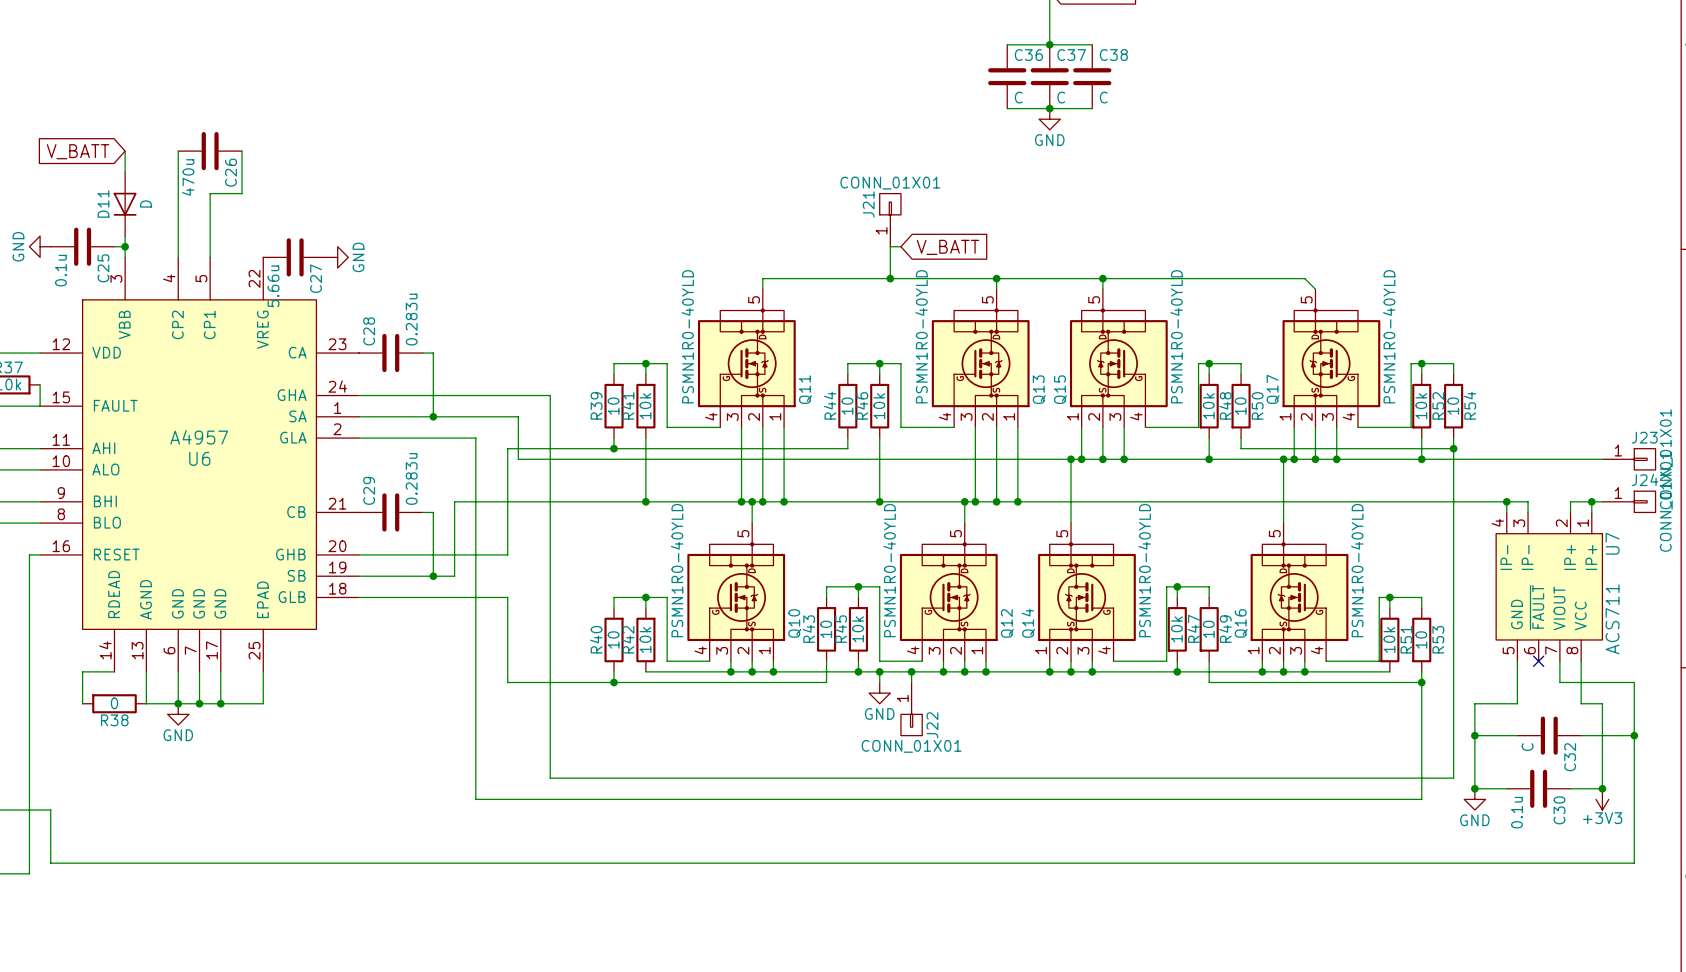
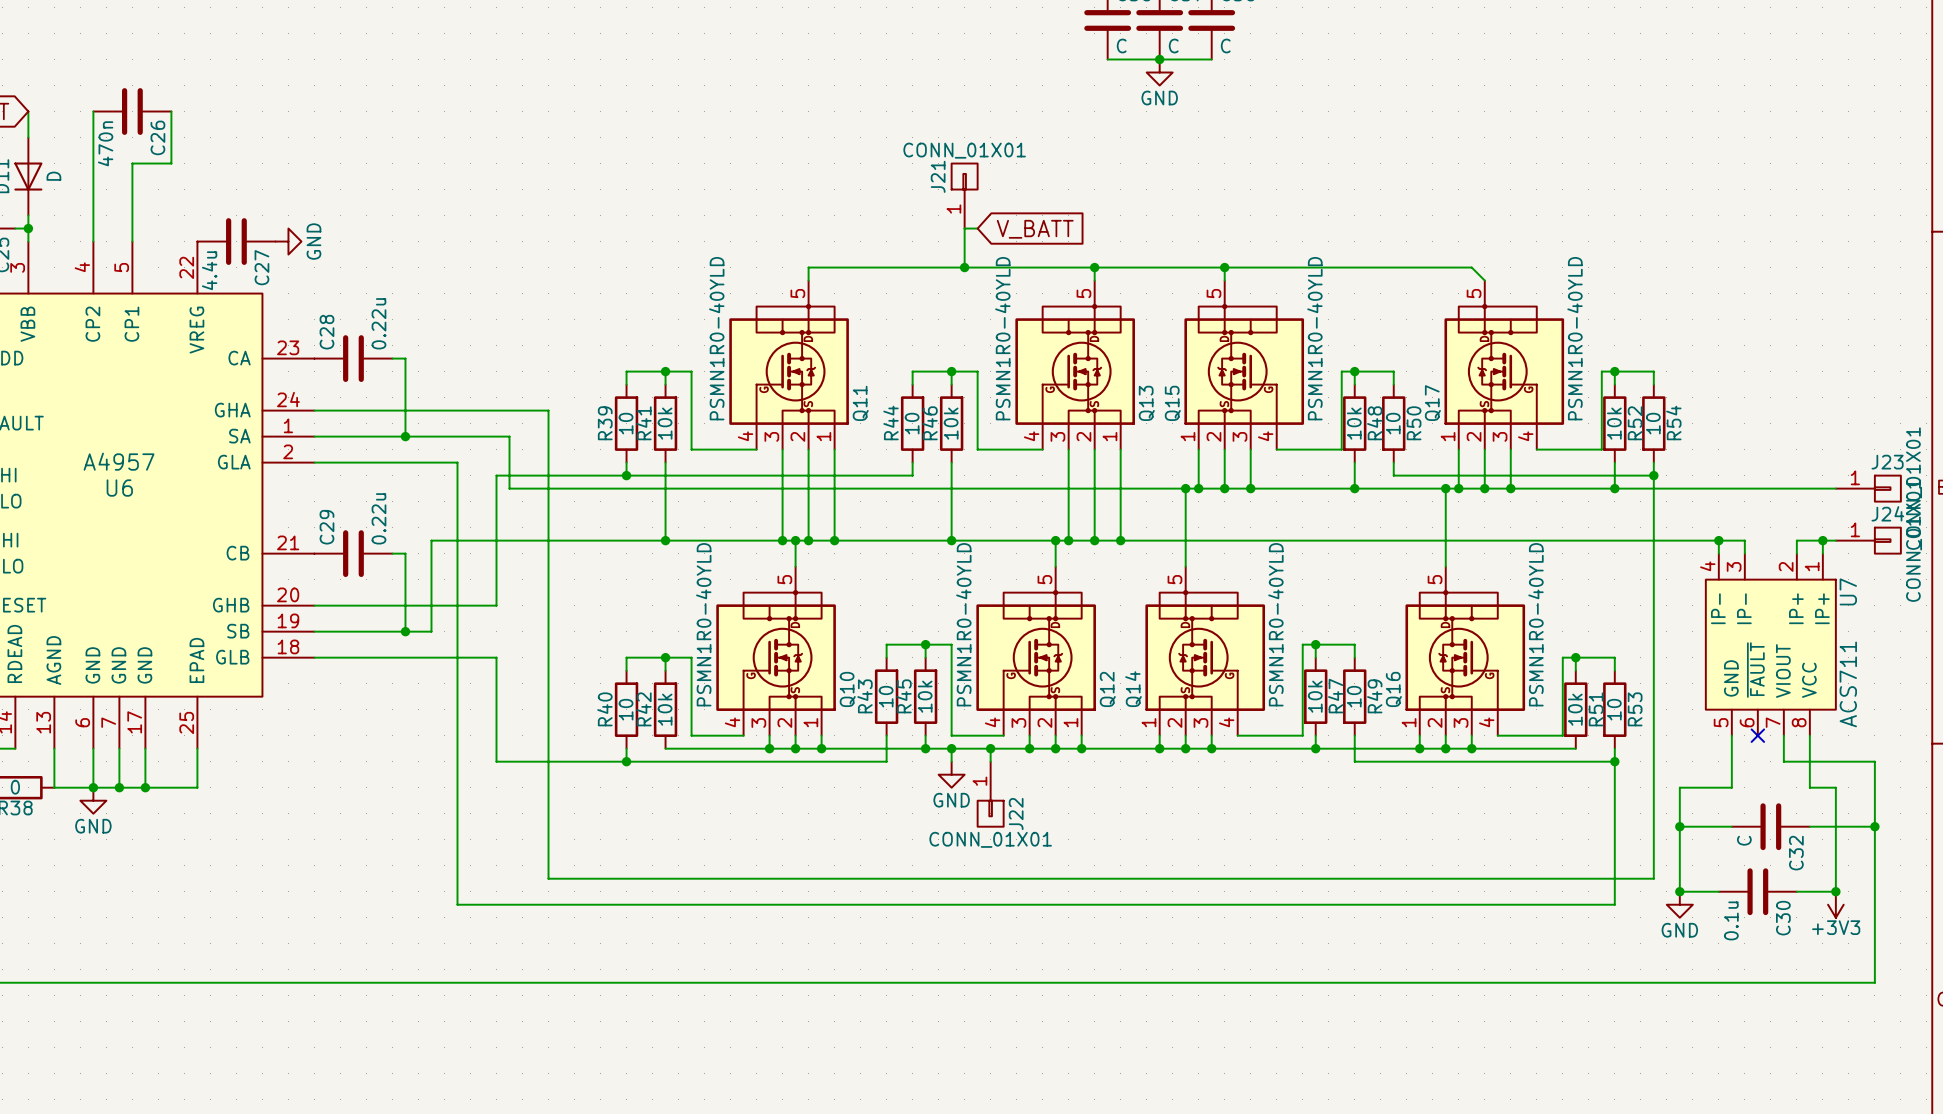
C26 value: 470u (188, 177) -> 470n (105, 143)
C27 value: 5.66u (273, 286) -> 4.4u (209, 270)
C28 value: 0.283u (411, 319) -> 0.22u (378, 323)
C29 value: 0.283u (411, 478) -> 0.22u (378, 518)

